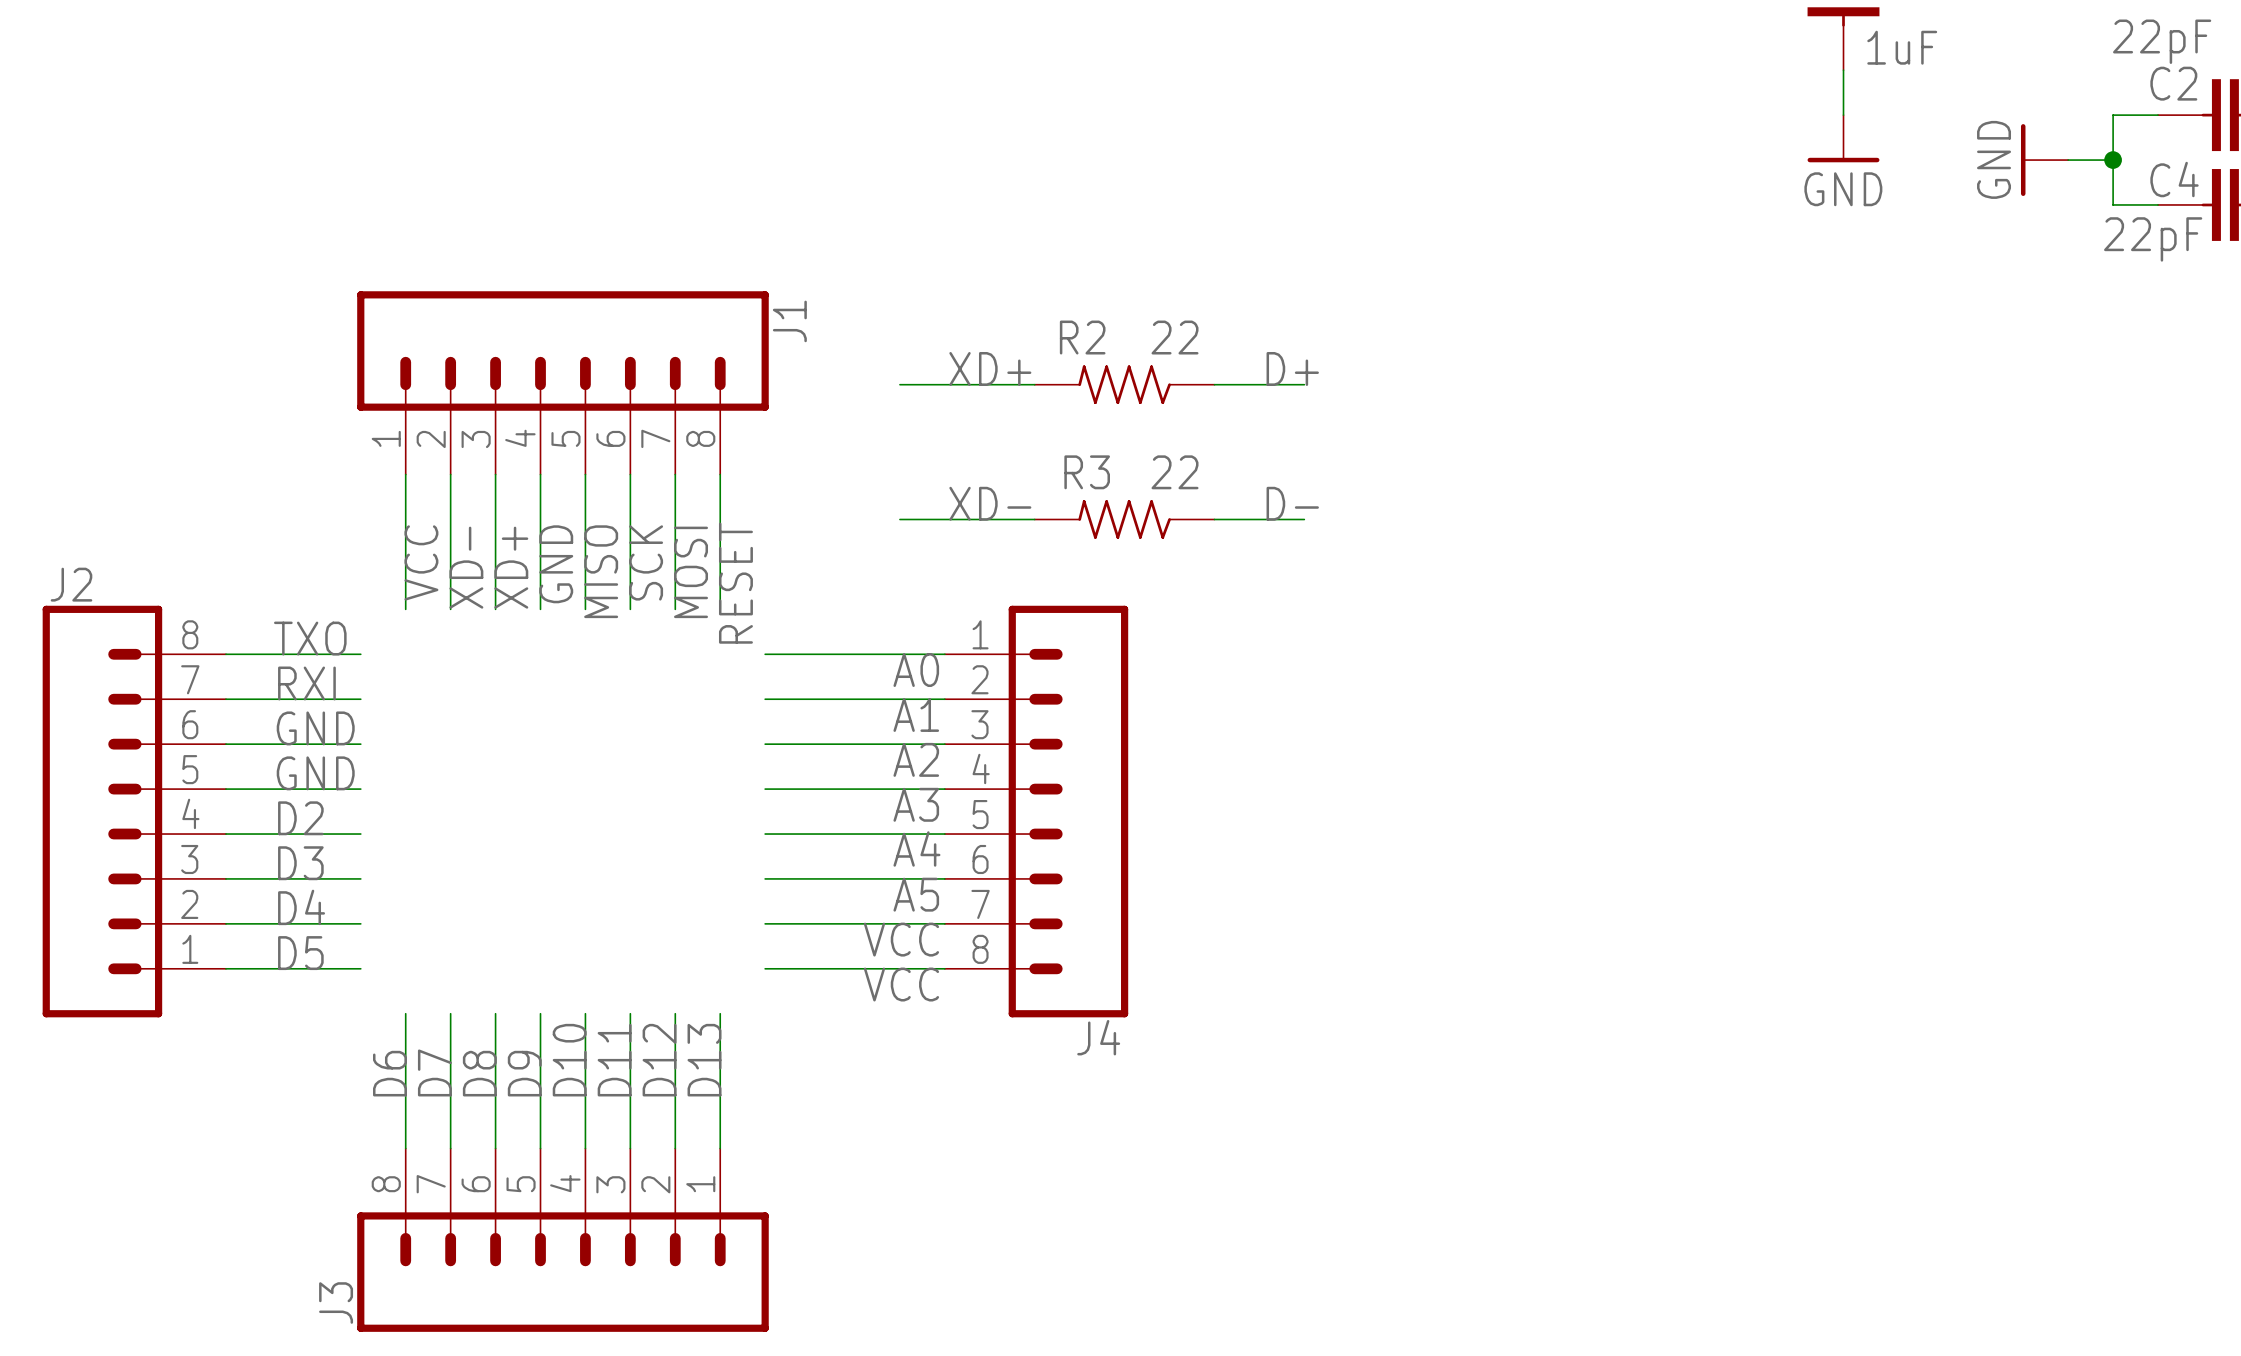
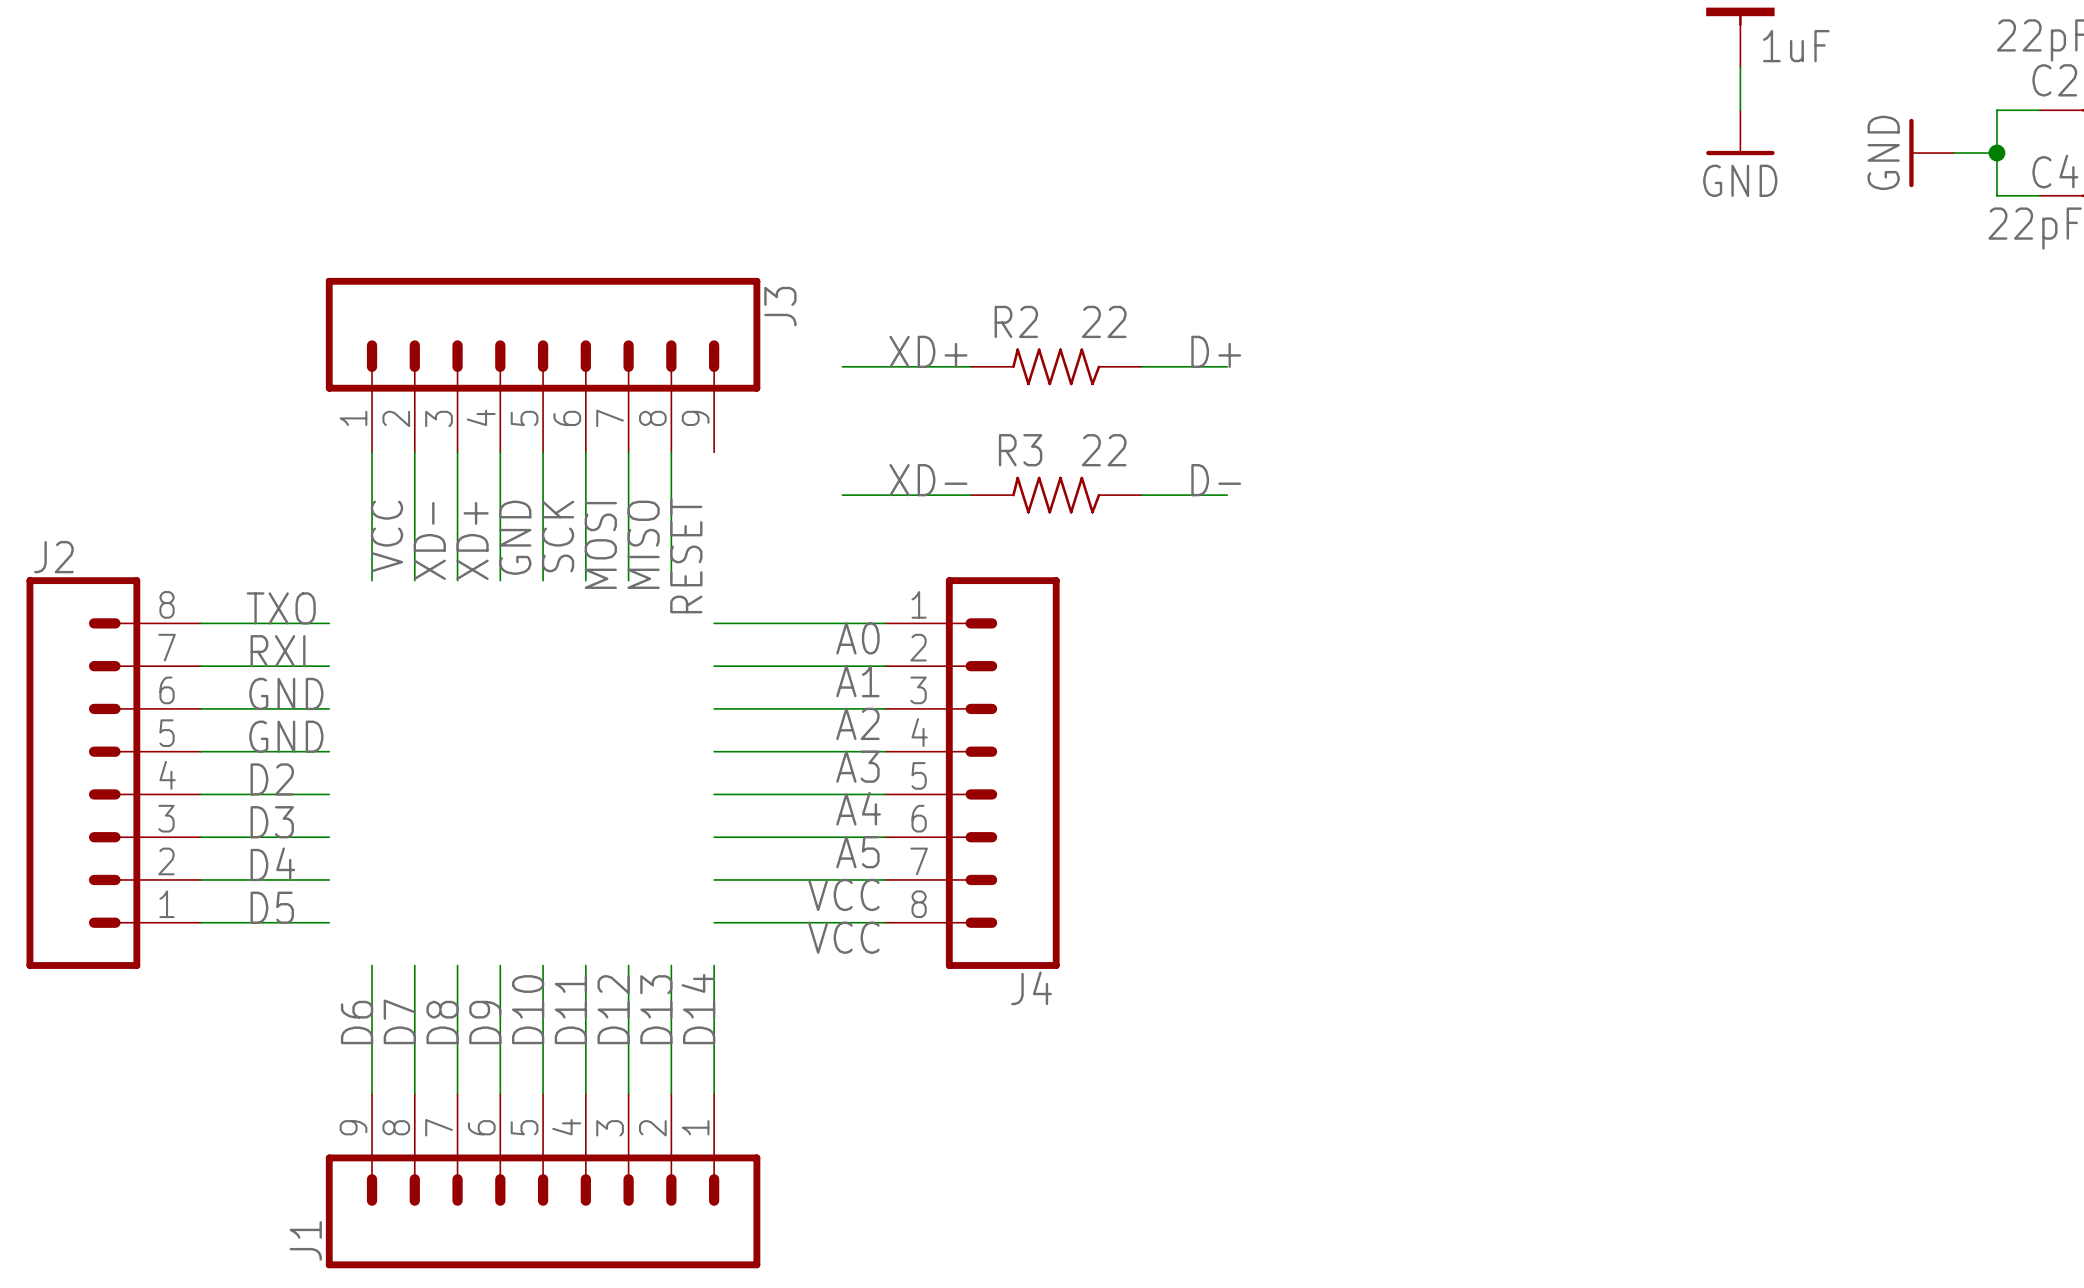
J1 symbol: [357, 291, 769, 475] -> [325, 1093, 761, 1269]
J1 name position: J1 (789, 321) -> J1 (305, 1240)
label: SCK (646, 562) -> MOSI (600, 545)
label: MISO (601, 571) -> SCK (558, 536)
label: MOSI (691, 572) -> MISO (643, 544)
wire: none -> (714, 965) (714, 1093)
label: none -> D14 (698, 1009)
J3 symbol: [357, 1148, 769, 1332] -> [325, 277, 761, 453]
J3 name position: J3 (336, 1303) -> J3 (780, 306)

